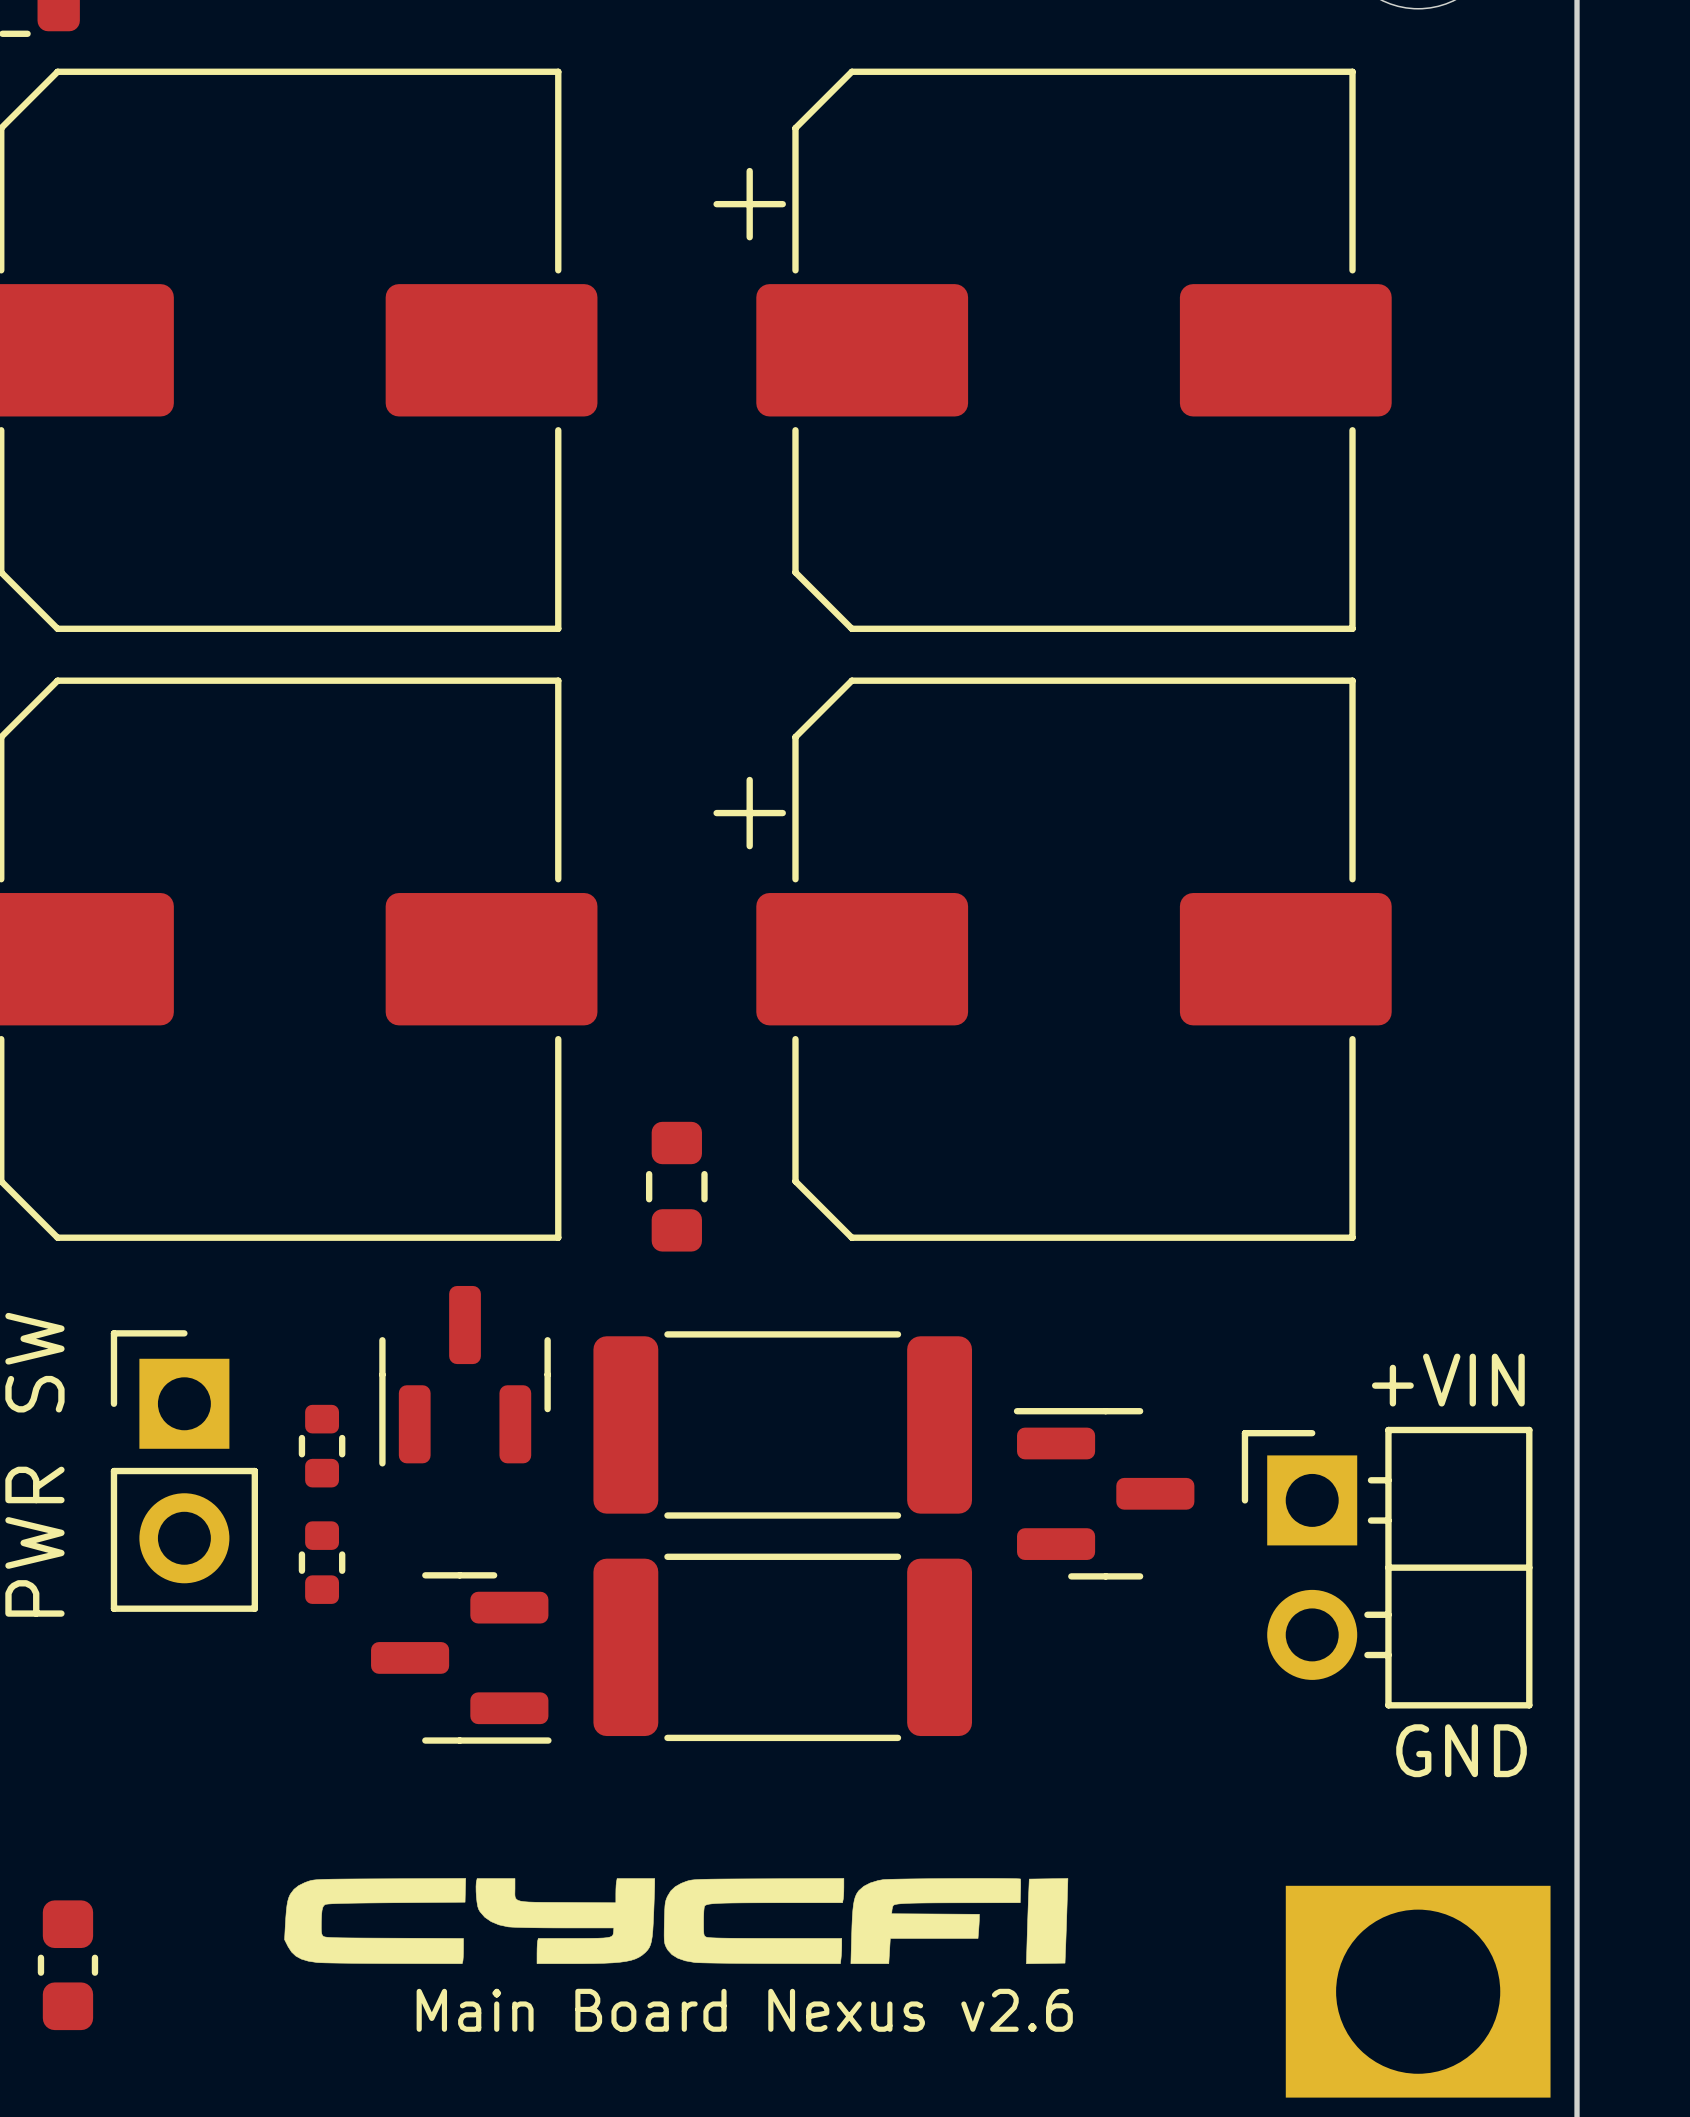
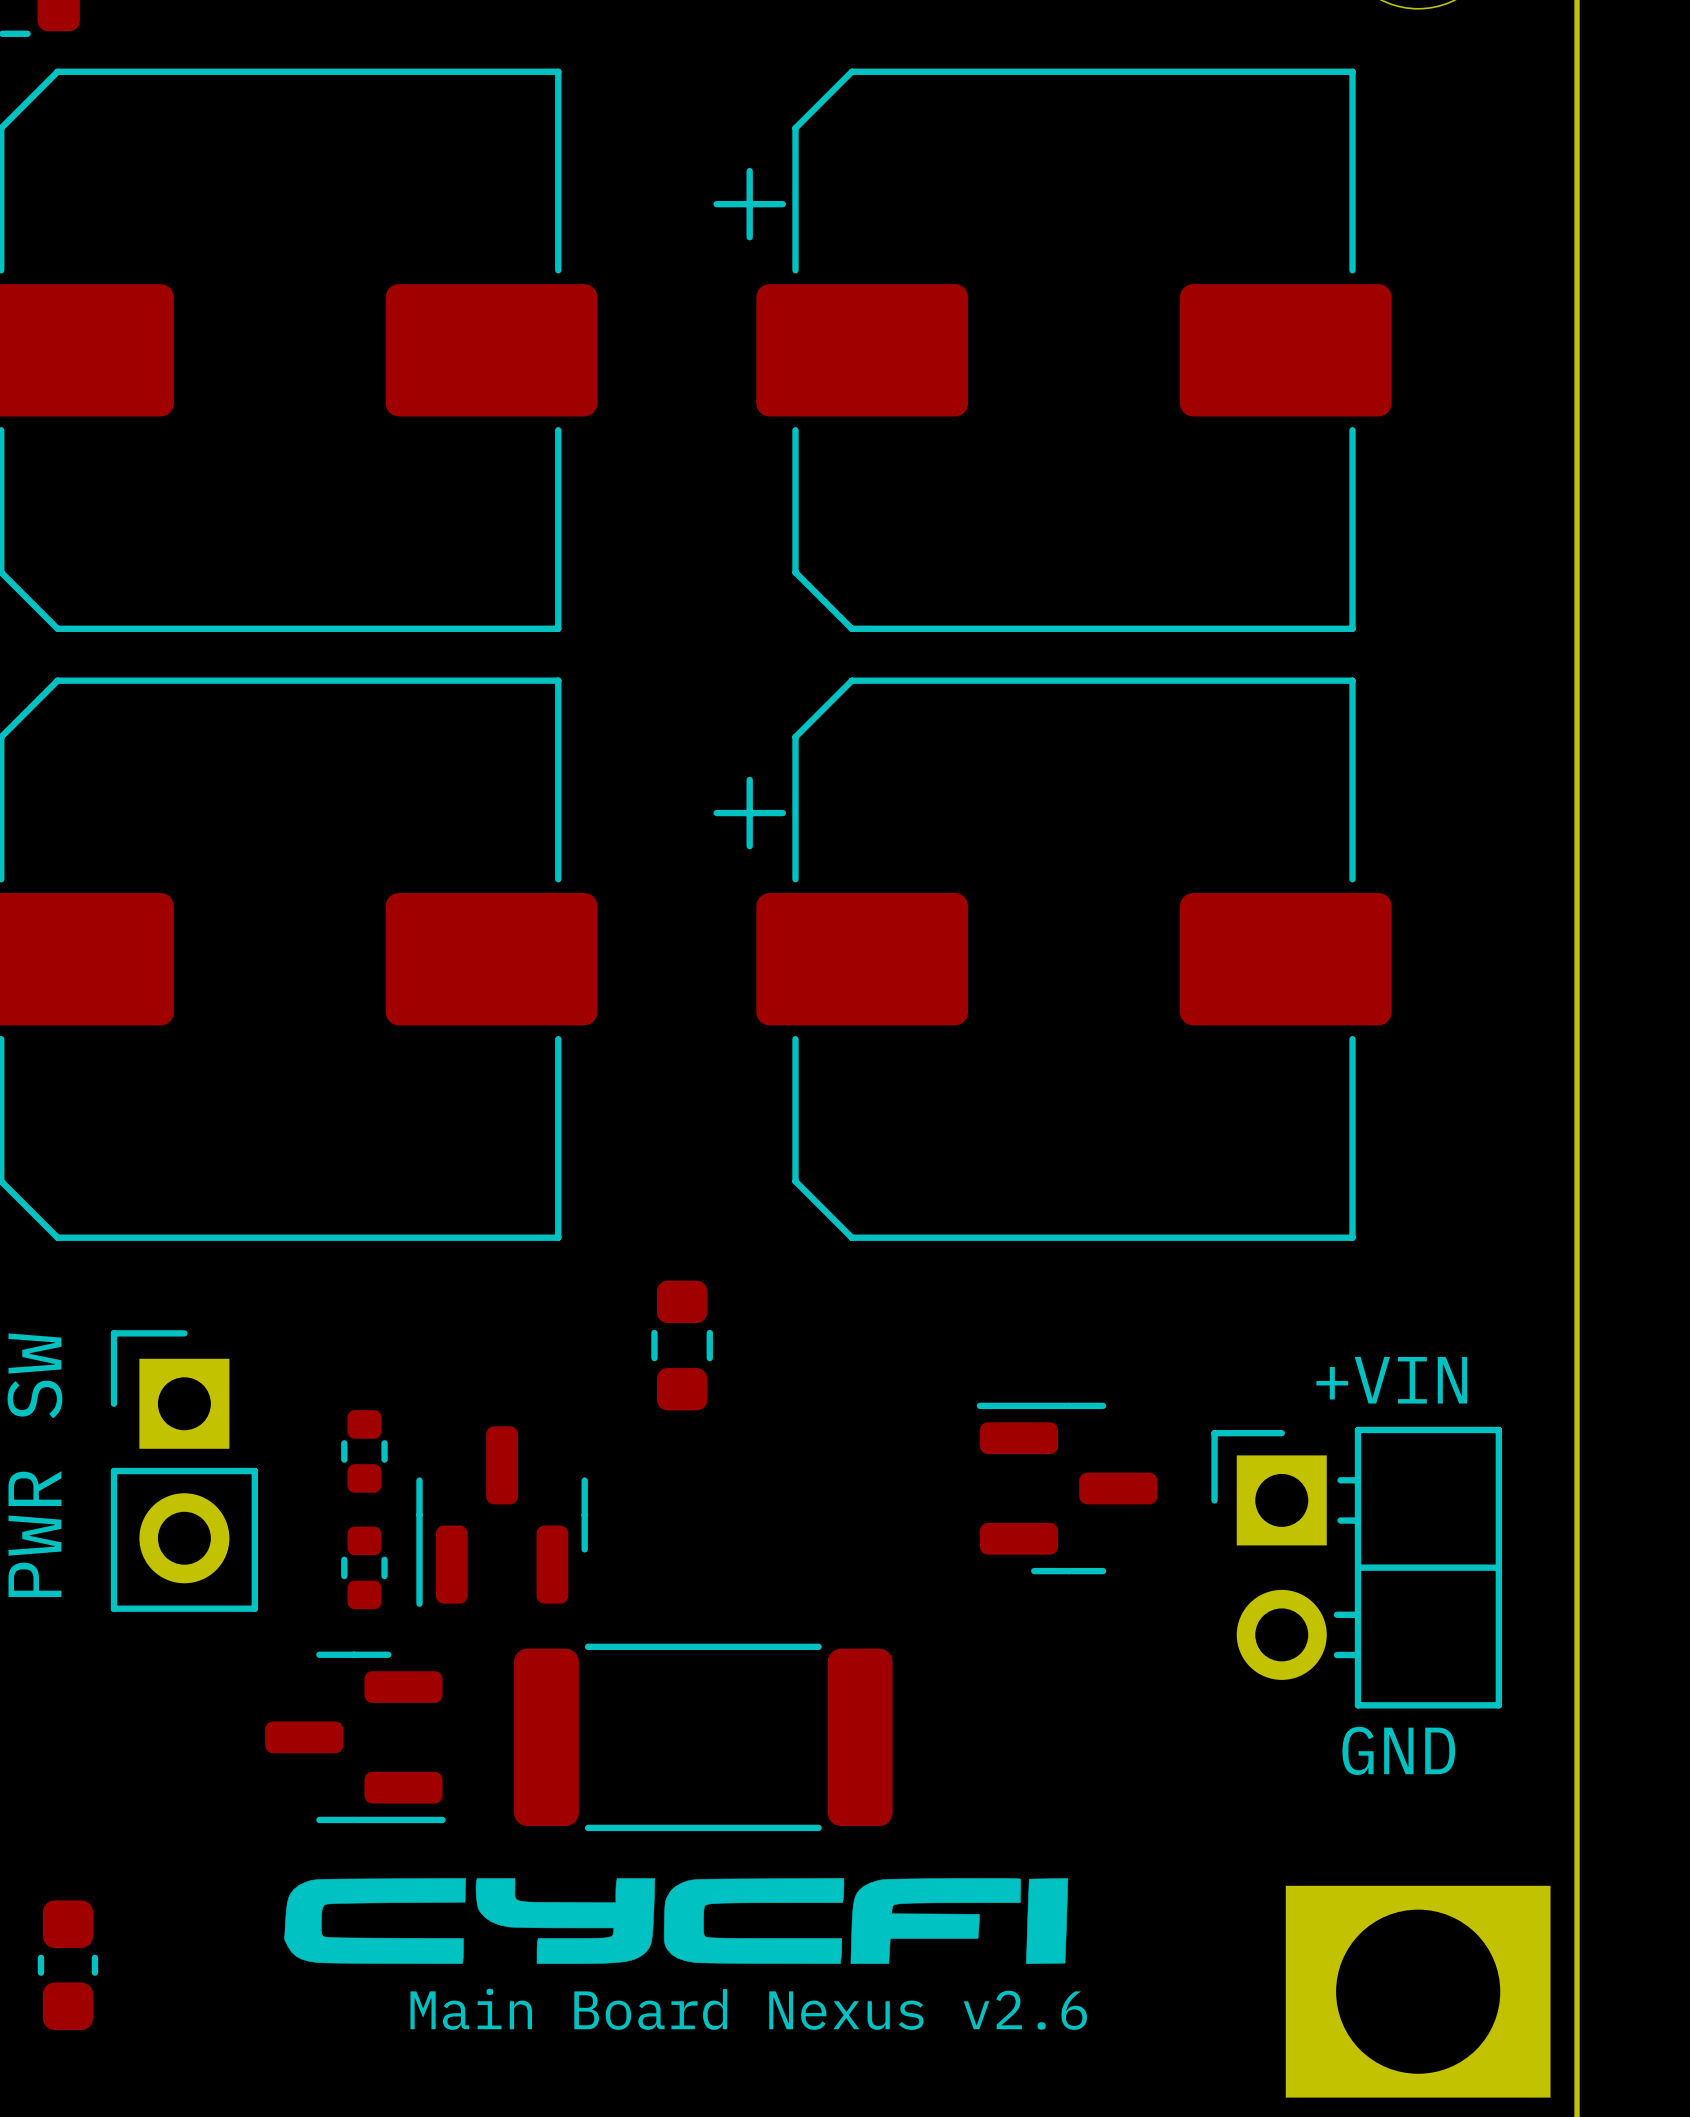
part position: (676, 1186) -> (682, 1345)
part: (465, 1376) -> none
text position: +VIN (1448, 1380) -> +VIN (1391, 1380)
part: (782, 1424) -> none
part position: (322, 1446) -> (364, 1451)
part position: (1104, 1493) -> (1067, 1488)
part: none -> (502, 1516)
part position: (322, 1562) -> (364, 1567)
part position: (1387, 1567) -> (1356, 1567)
part position: (782, 1647) -> (703, 1737)
part: (461, 1657) -> none
part: none -> (355, 1737)
text position: GND (1461, 1750) -> GND (1398, 1750)

